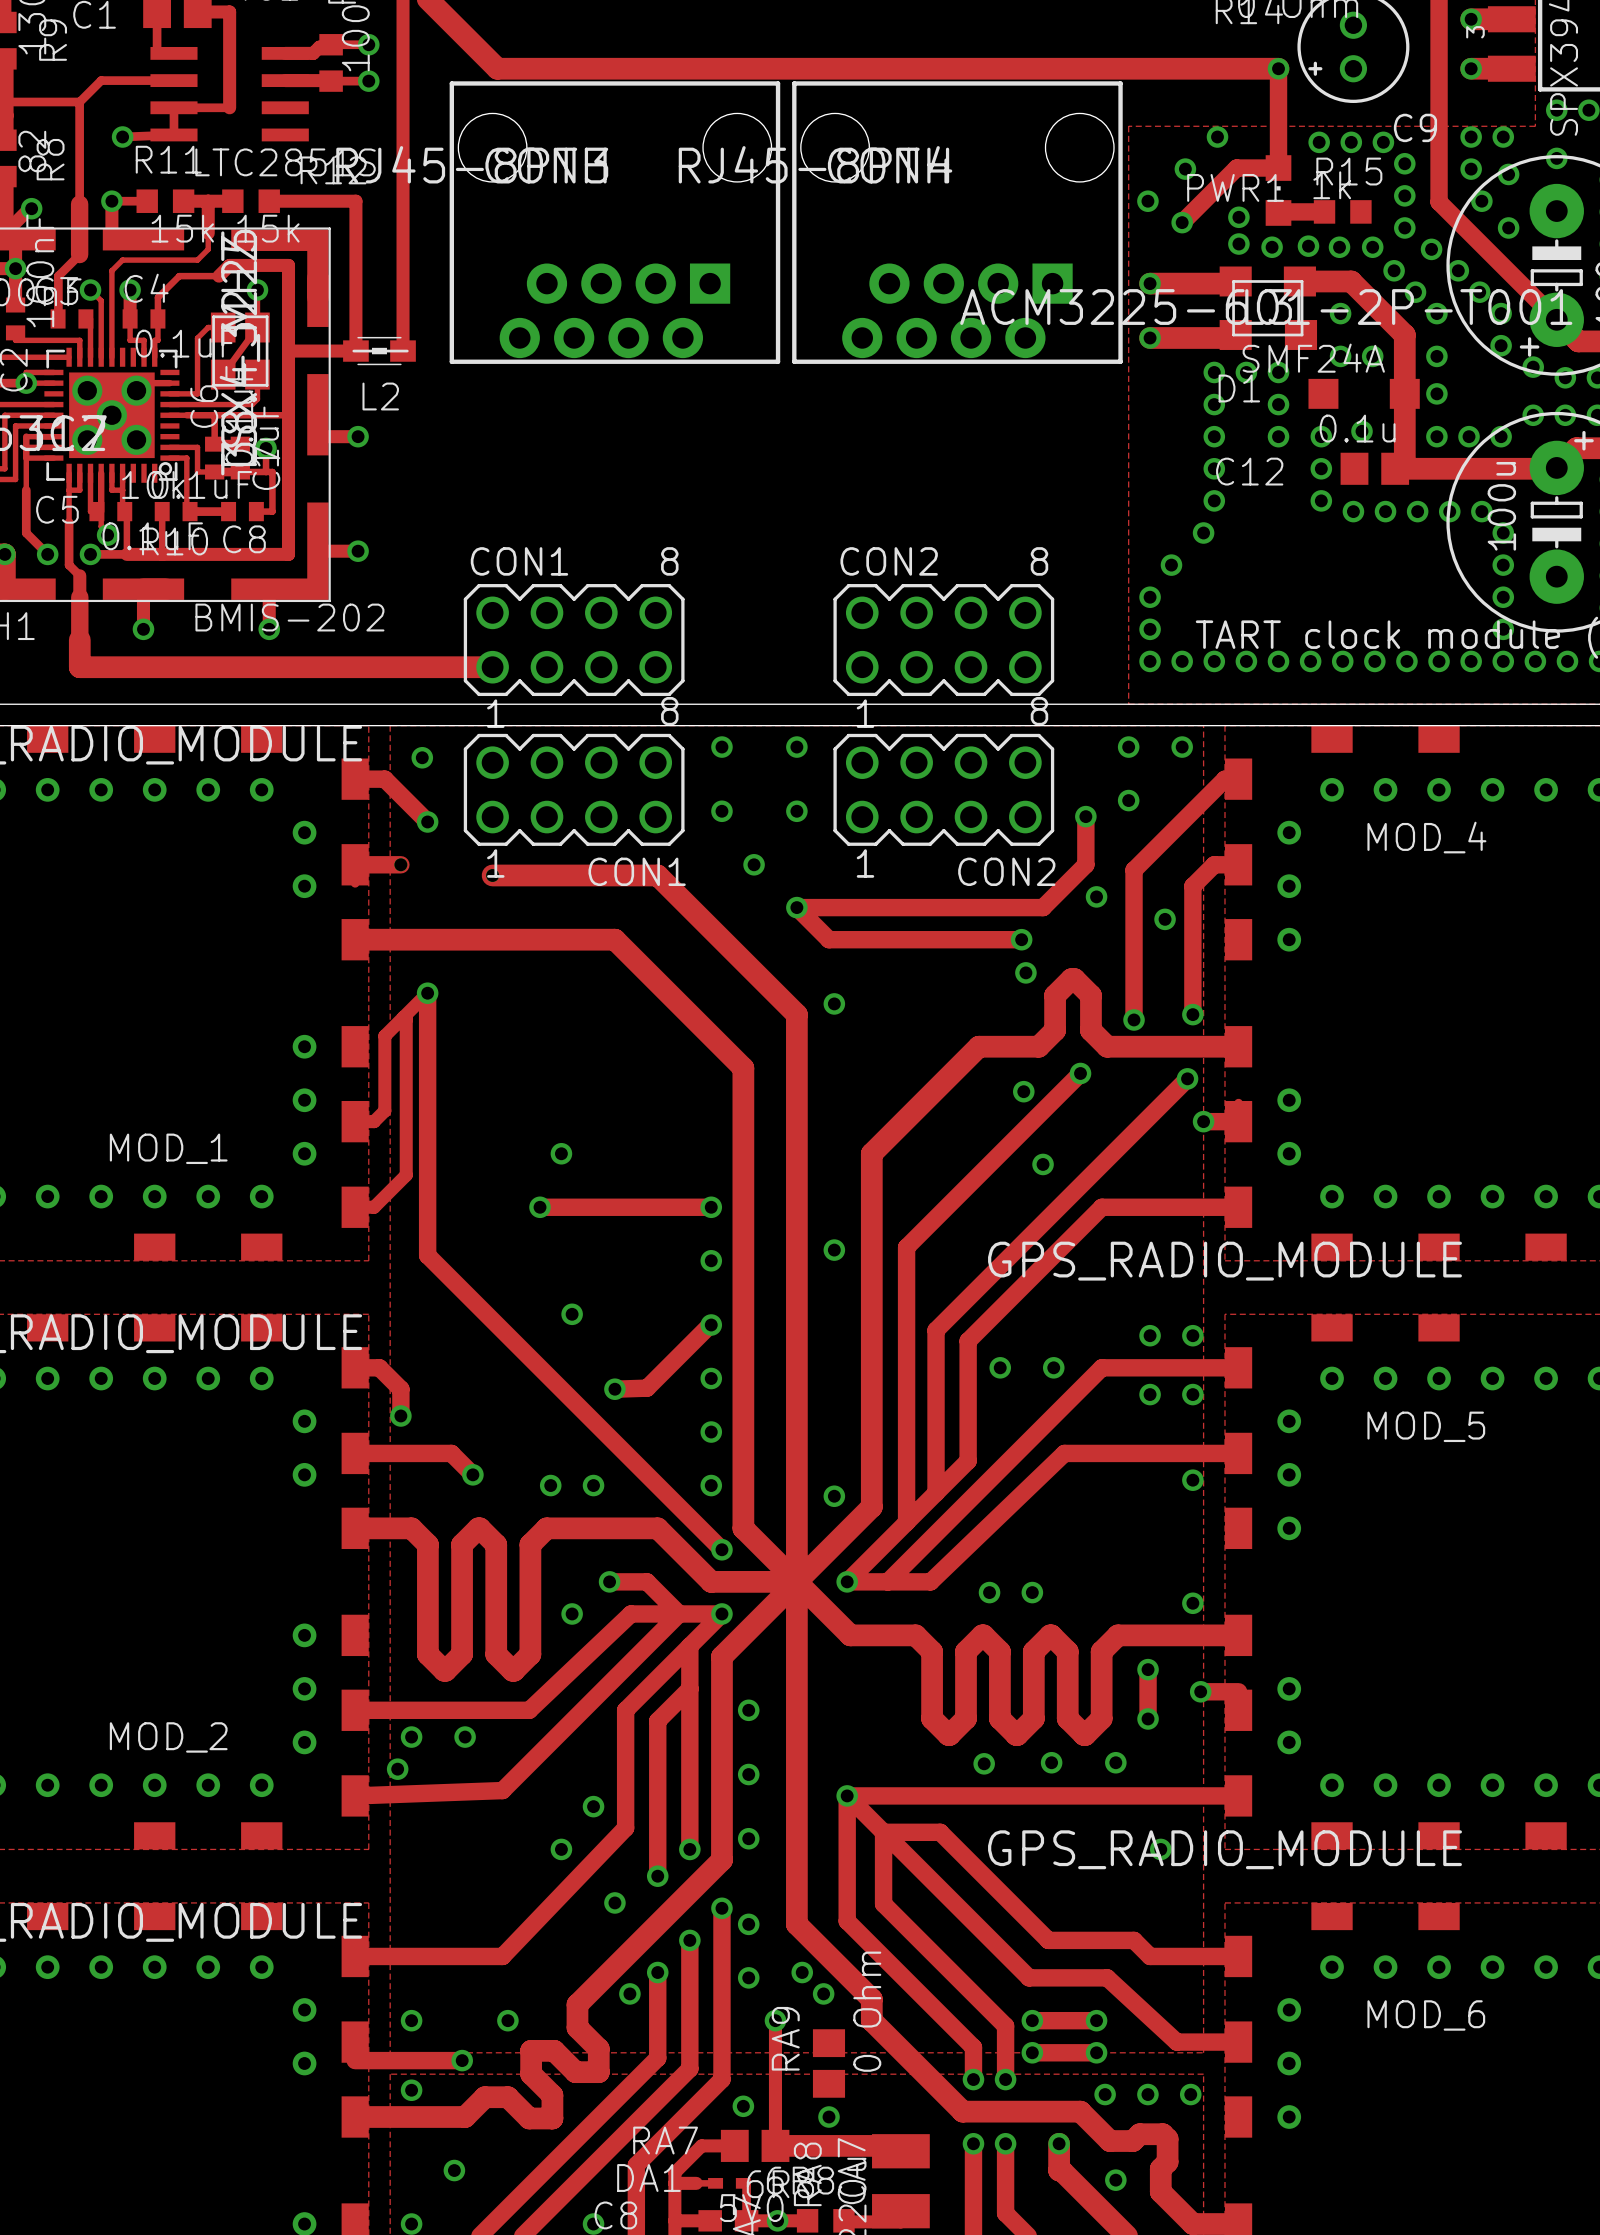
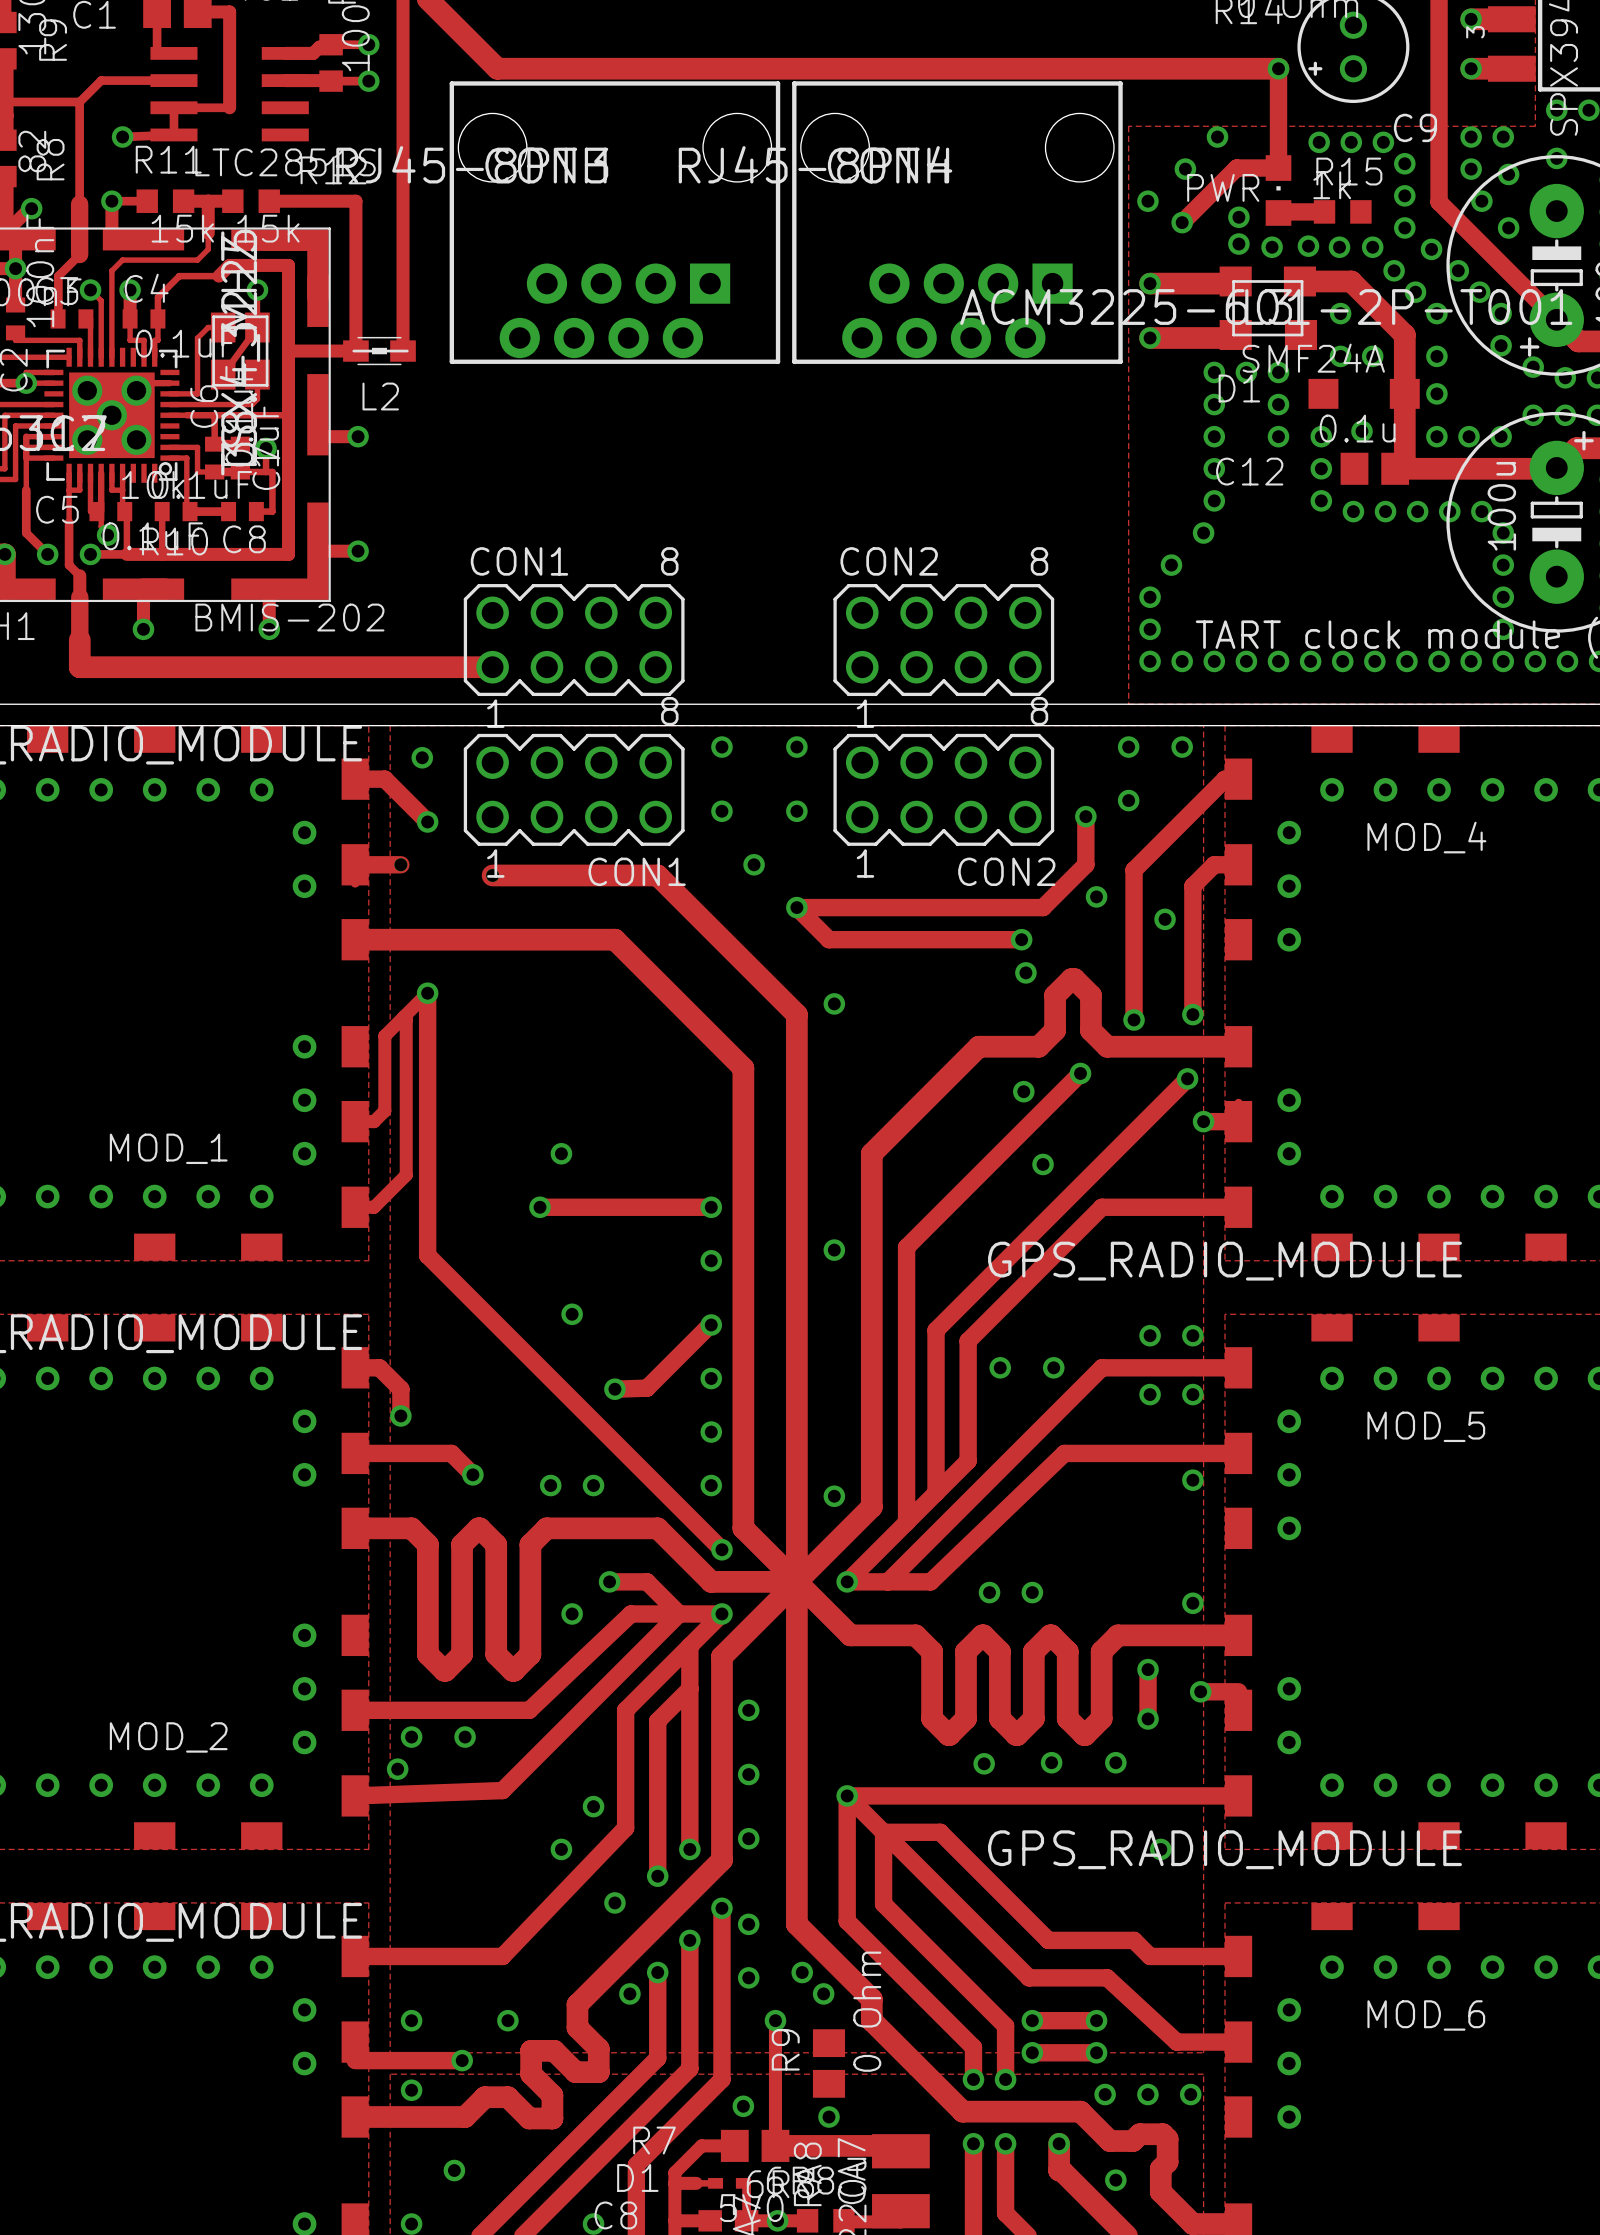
PWR1 name: PWR1 (1235, 187) -> PWR (1223, 187)
RA9 name: RA9 (785, 2038) -> R9 (785, 2049)
RA7 name: RA7 (665, 2140) -> R7 (654, 2140)
DA1 name: DA1 (648, 2177) -> D1 (637, 2177)

